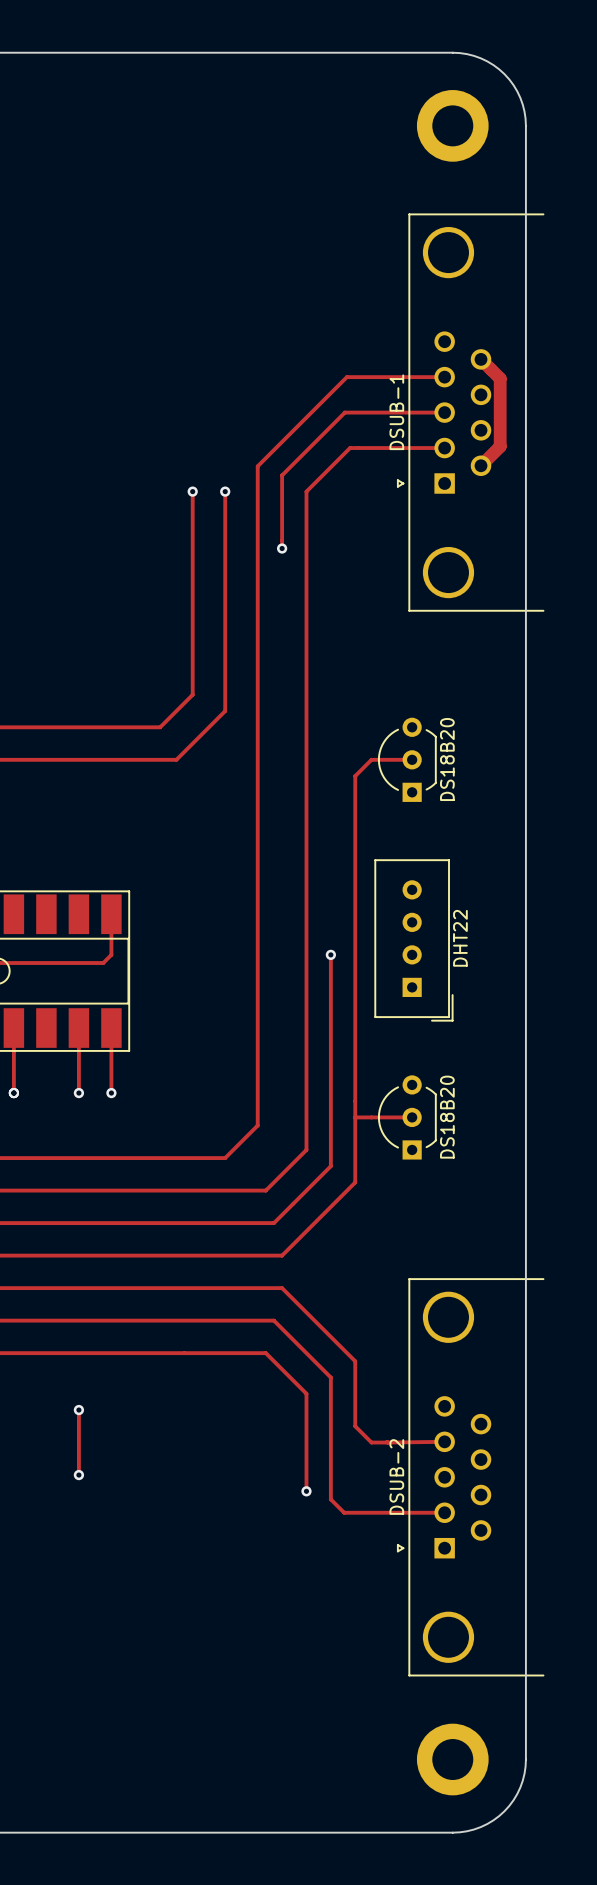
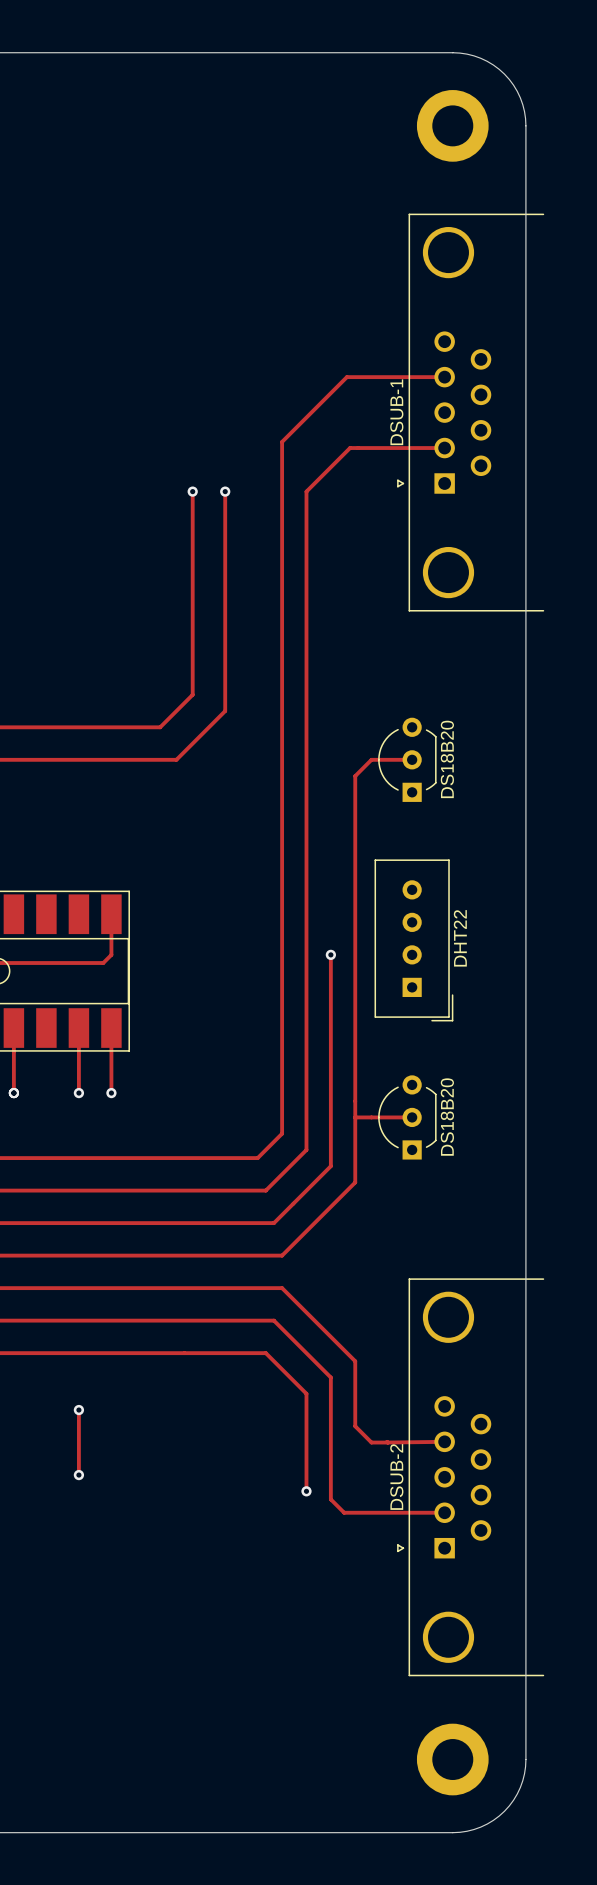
track: (481, 359) (500, 378) (500, 446) (481, 465) -> none
track: (444, 412) (344, 412) (282, 475) -> (282, 441) (282, 475)
track: (282, 441) (257, 466) (257, 1125) (225, 1158) -> (282, 548) (282, 1133) (257, 1158) (225, 1158)
via: (282, 548) -> none

